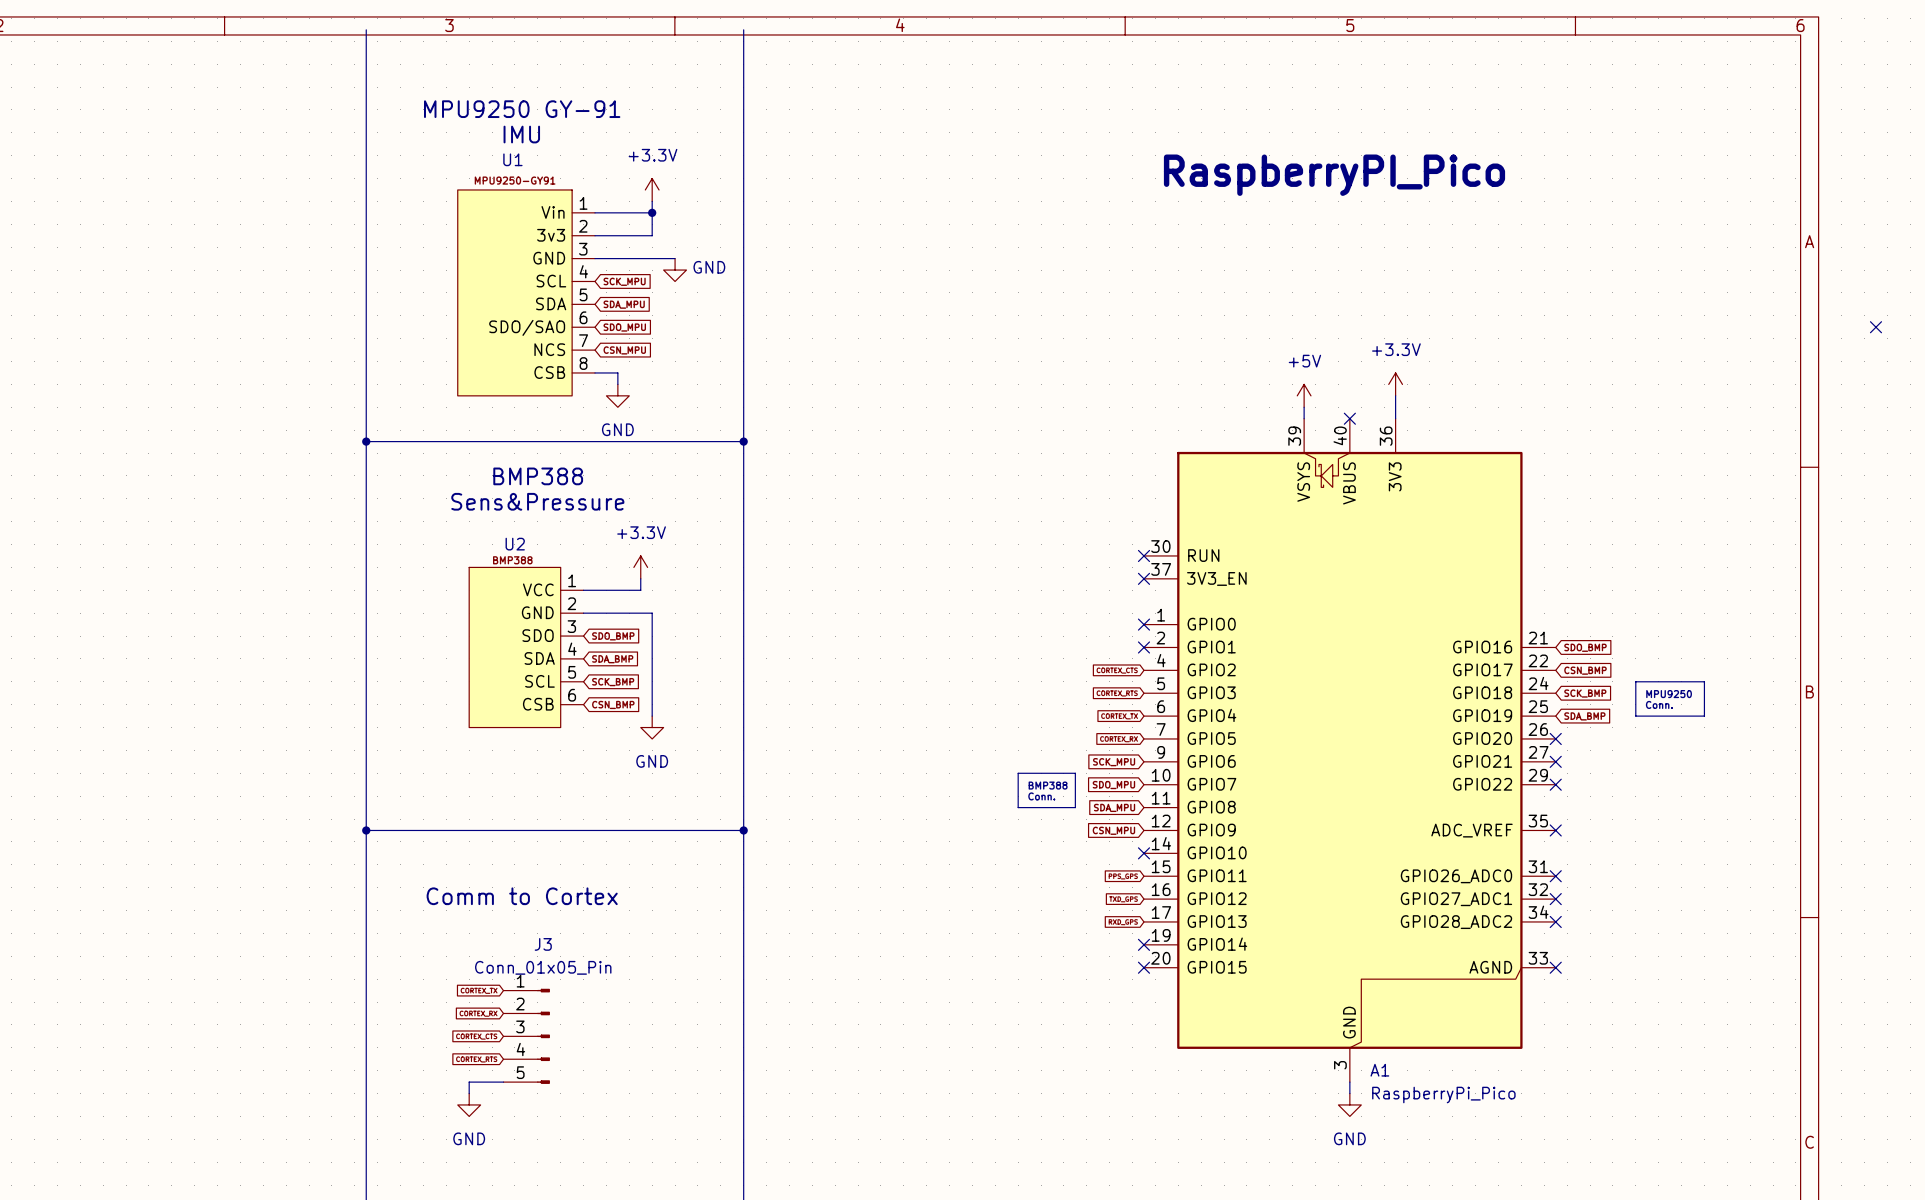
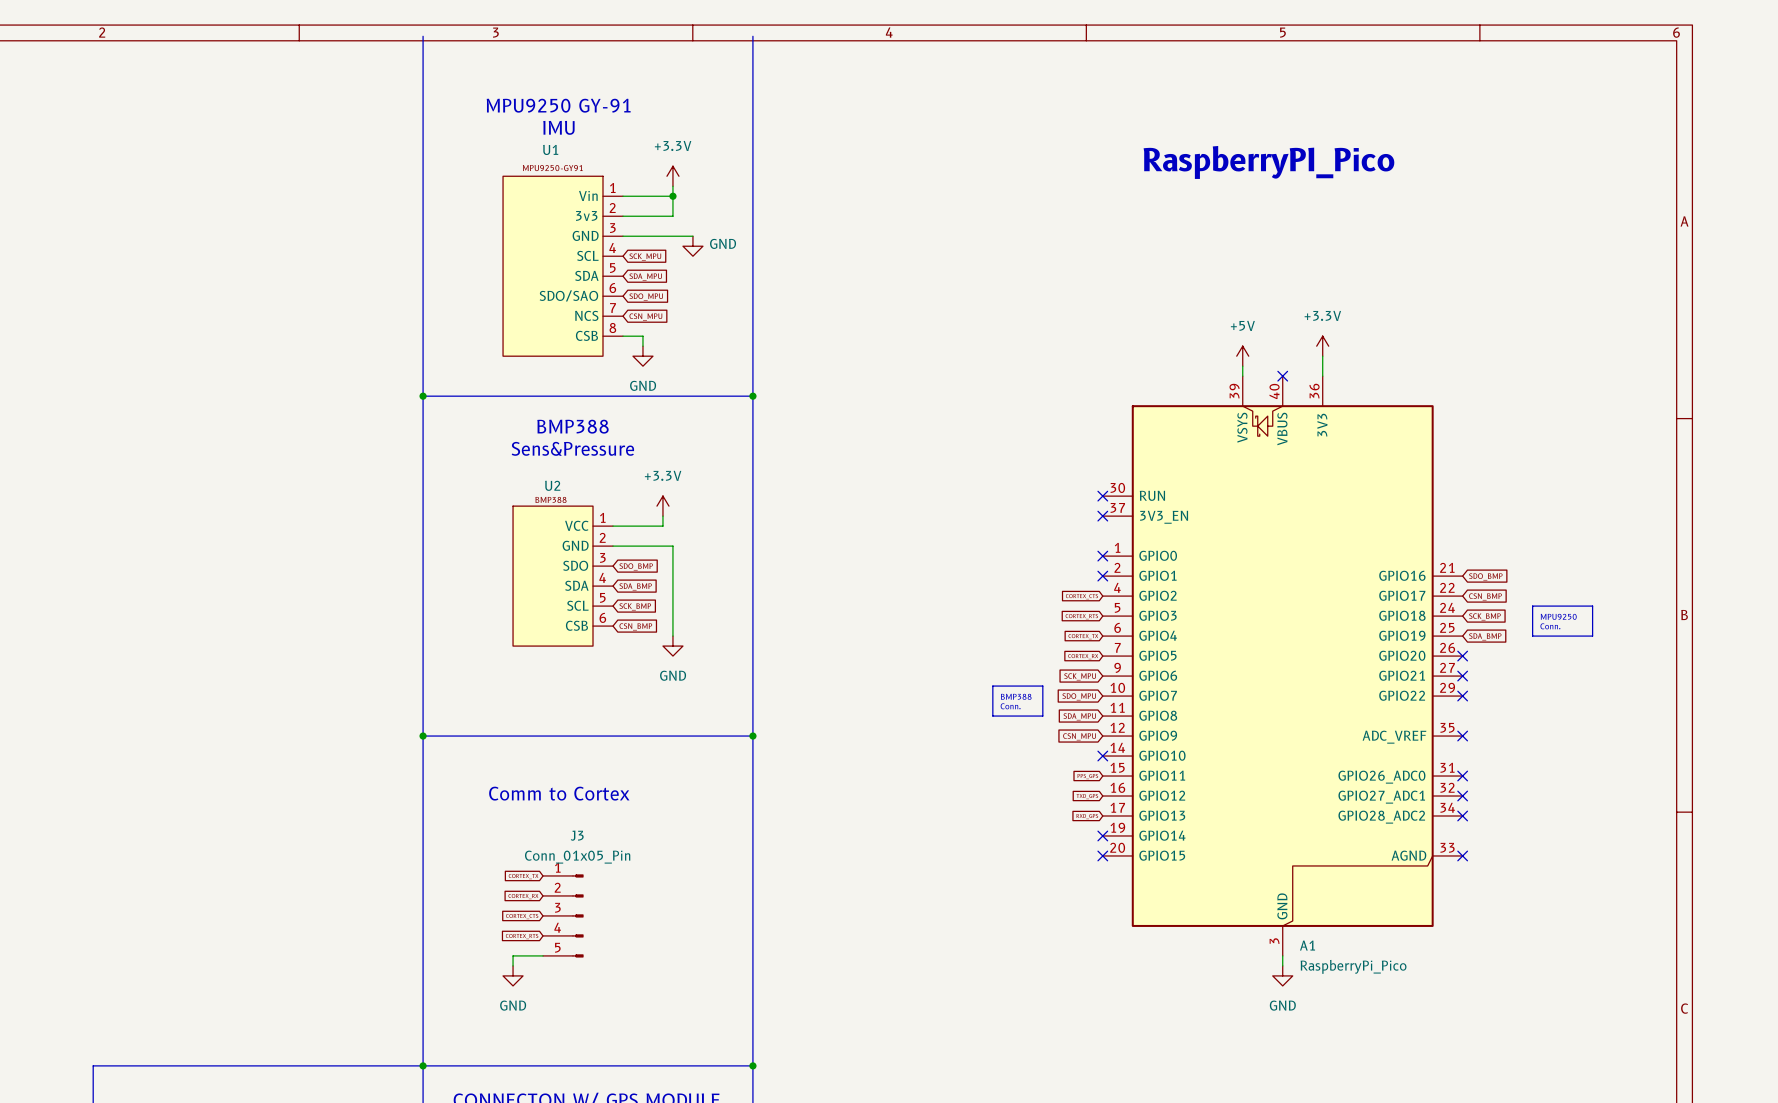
no-connect mark: (1875, 327) -> none

